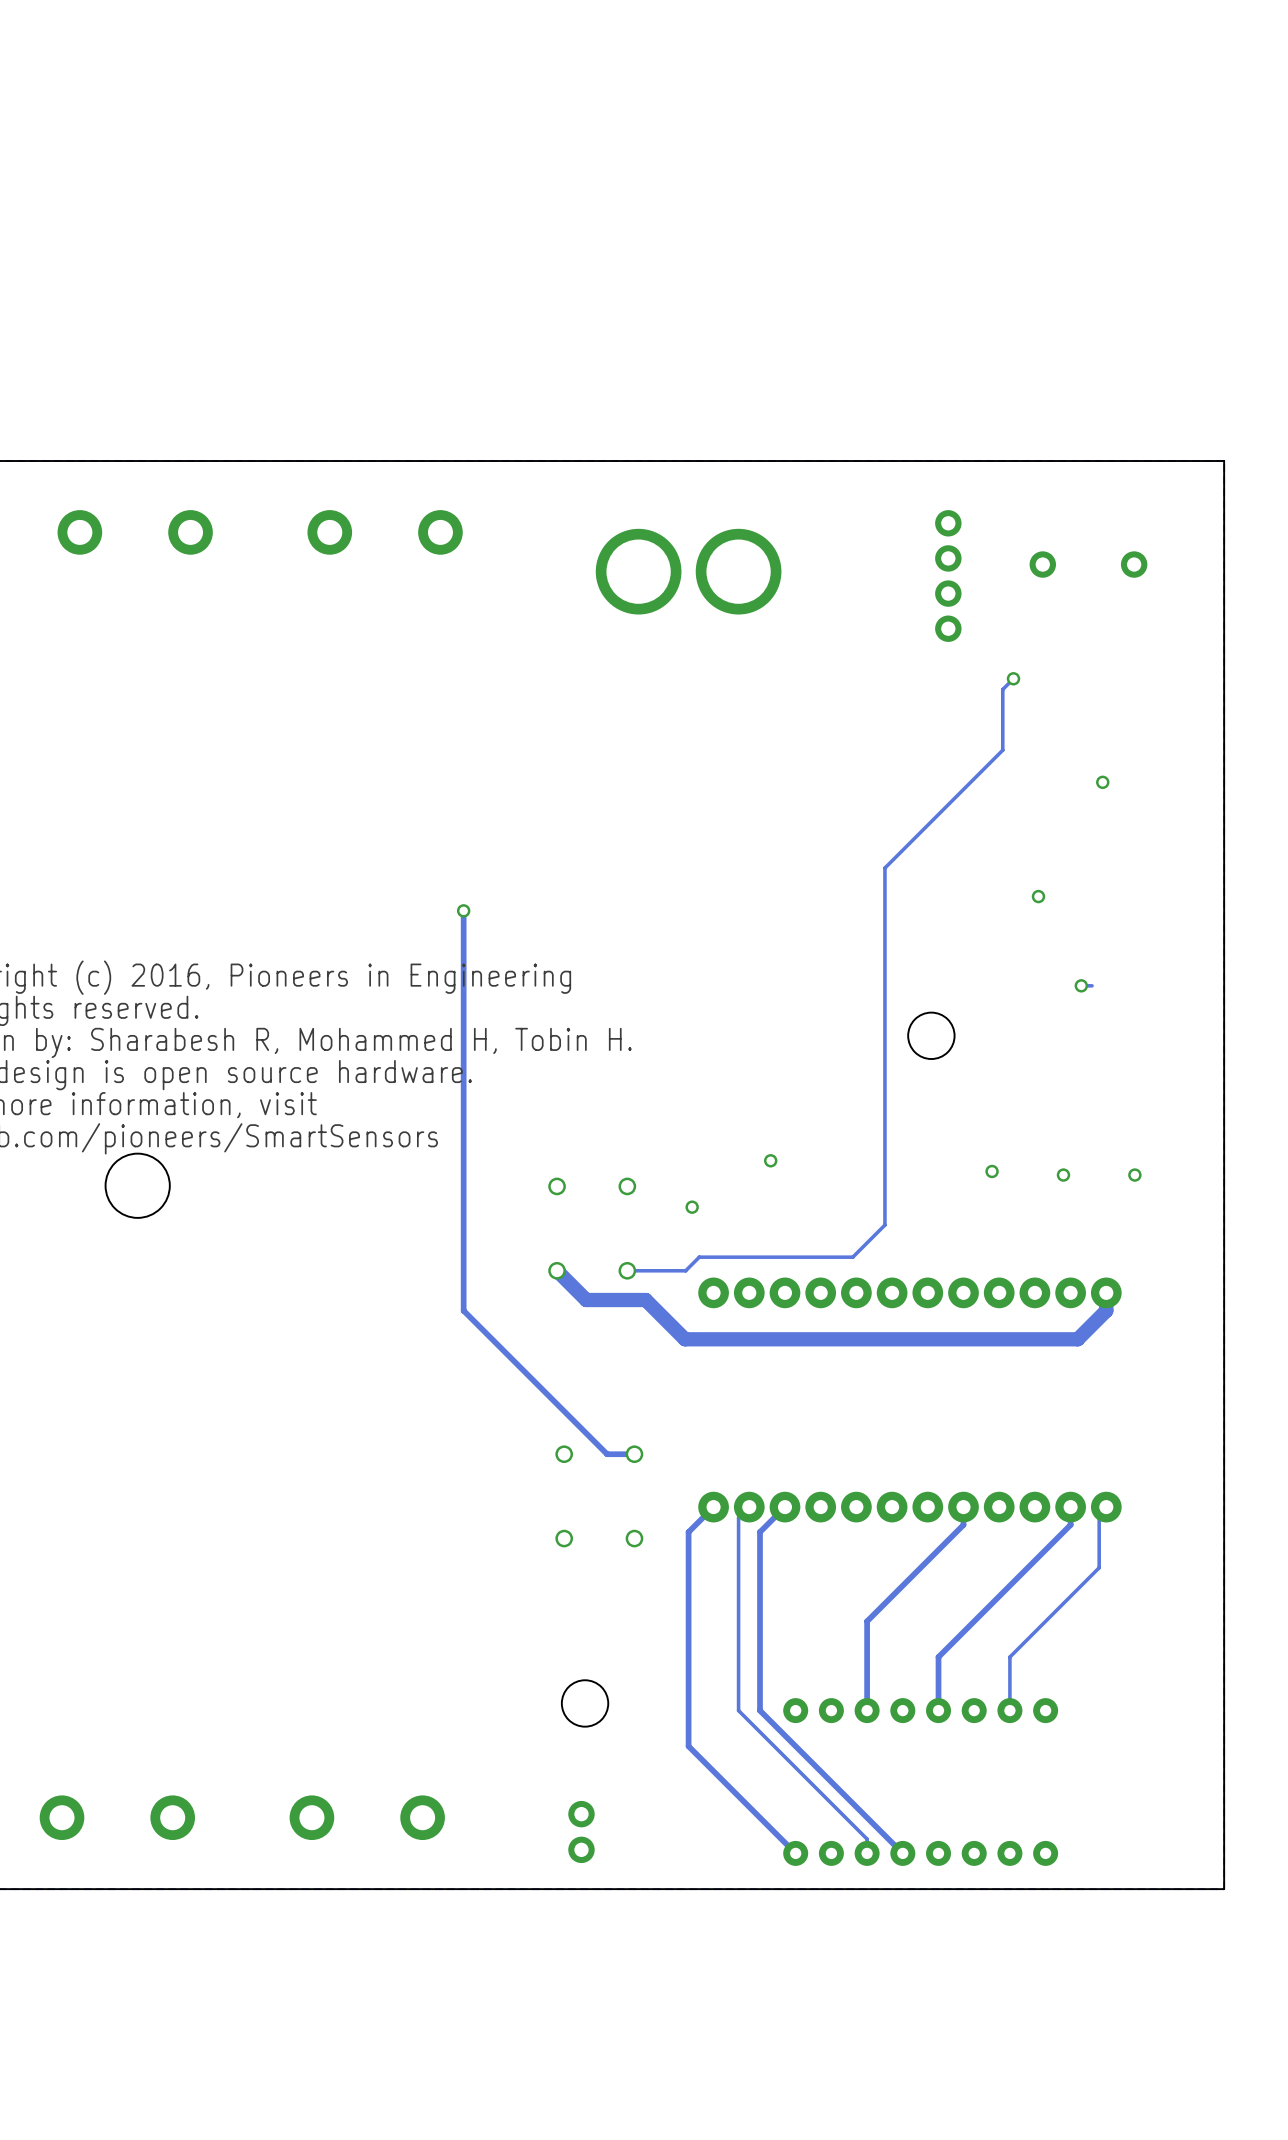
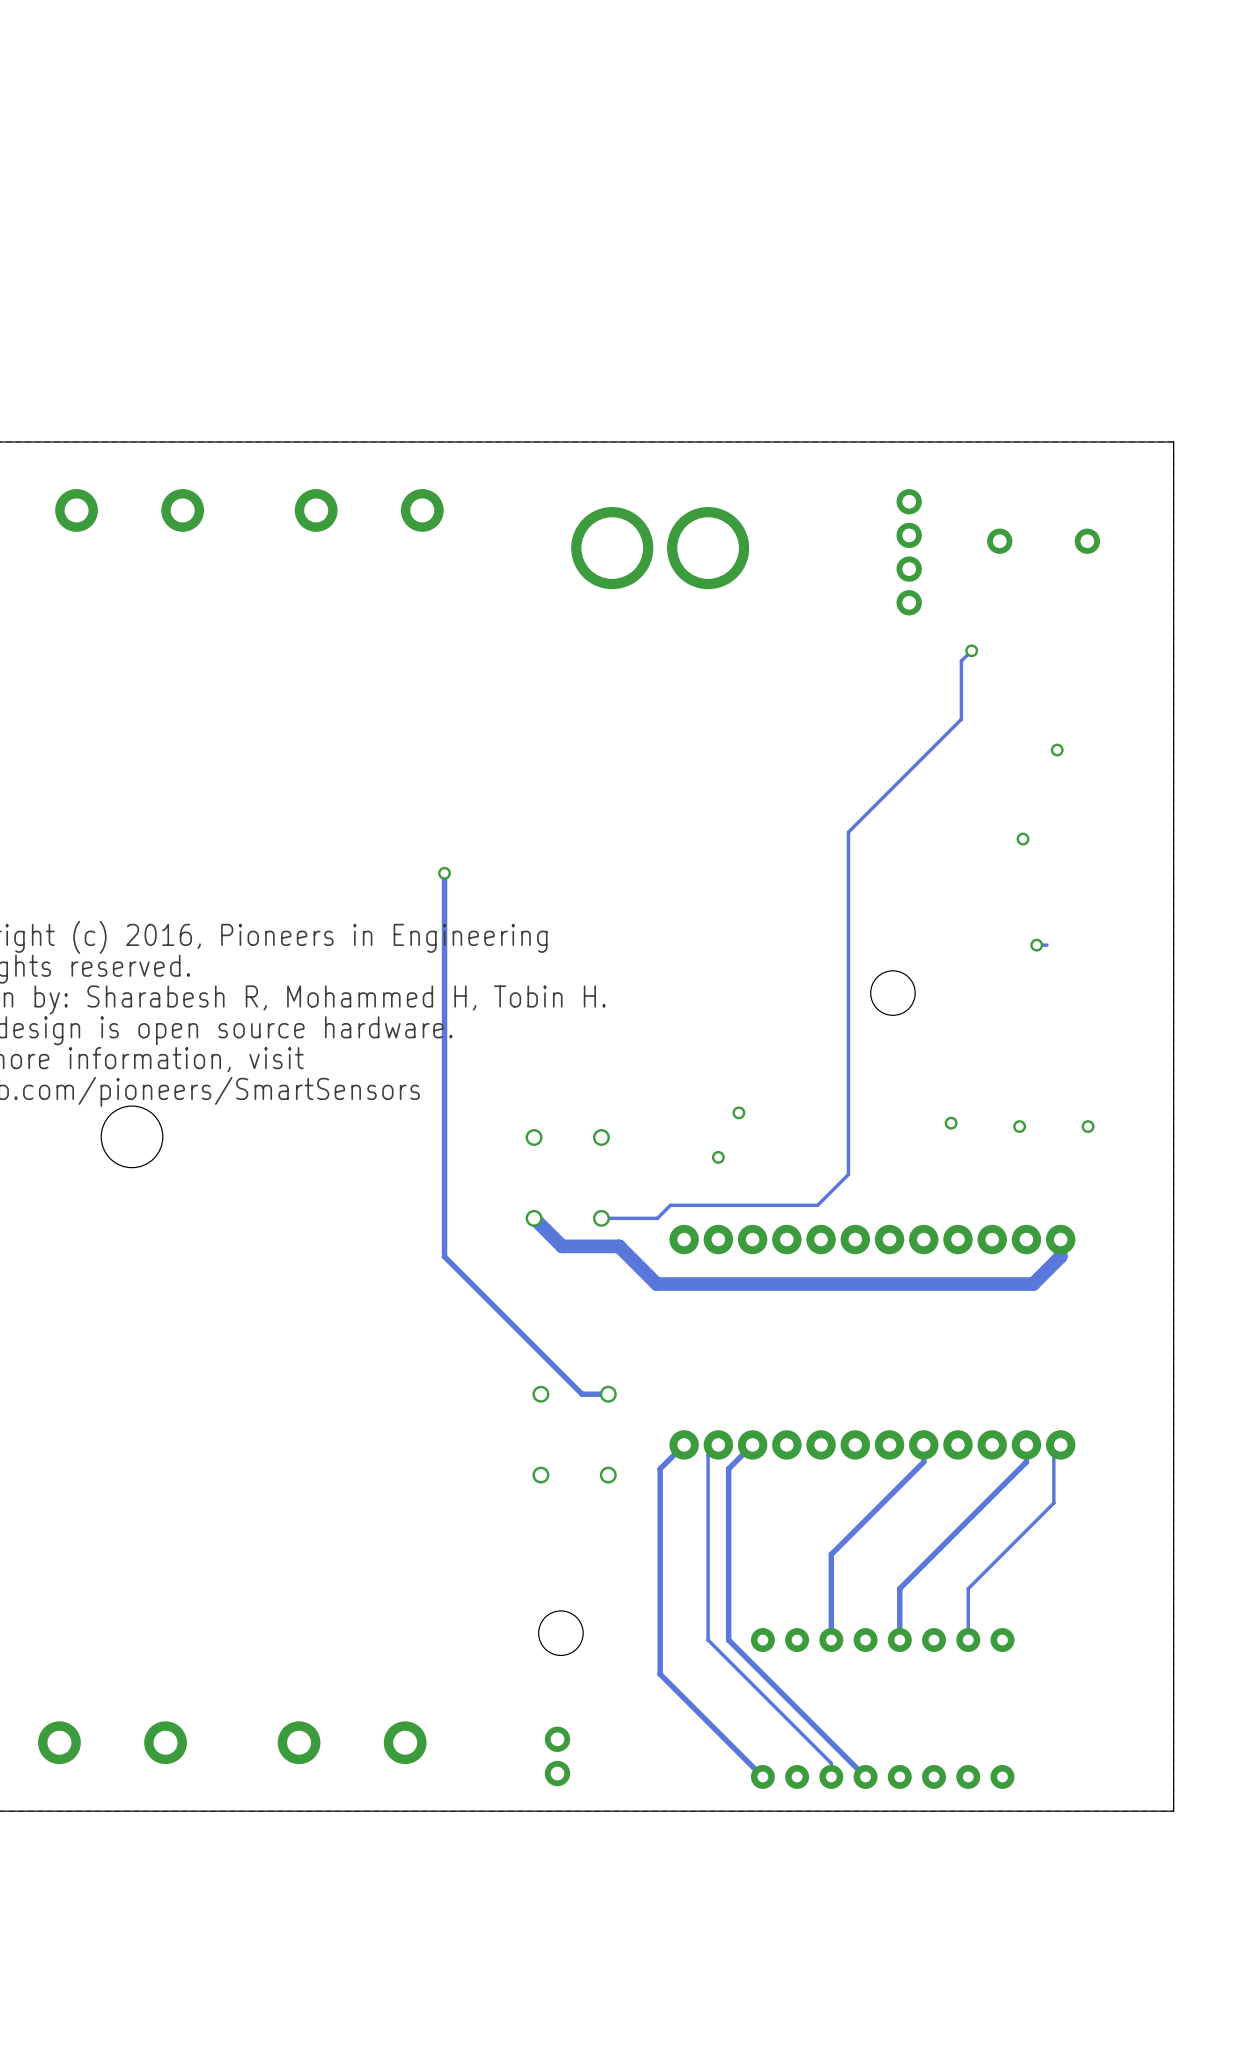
via position: (1038, 896) -> (1023, 839)
via position: (692, 1207) -> (718, 1157)

